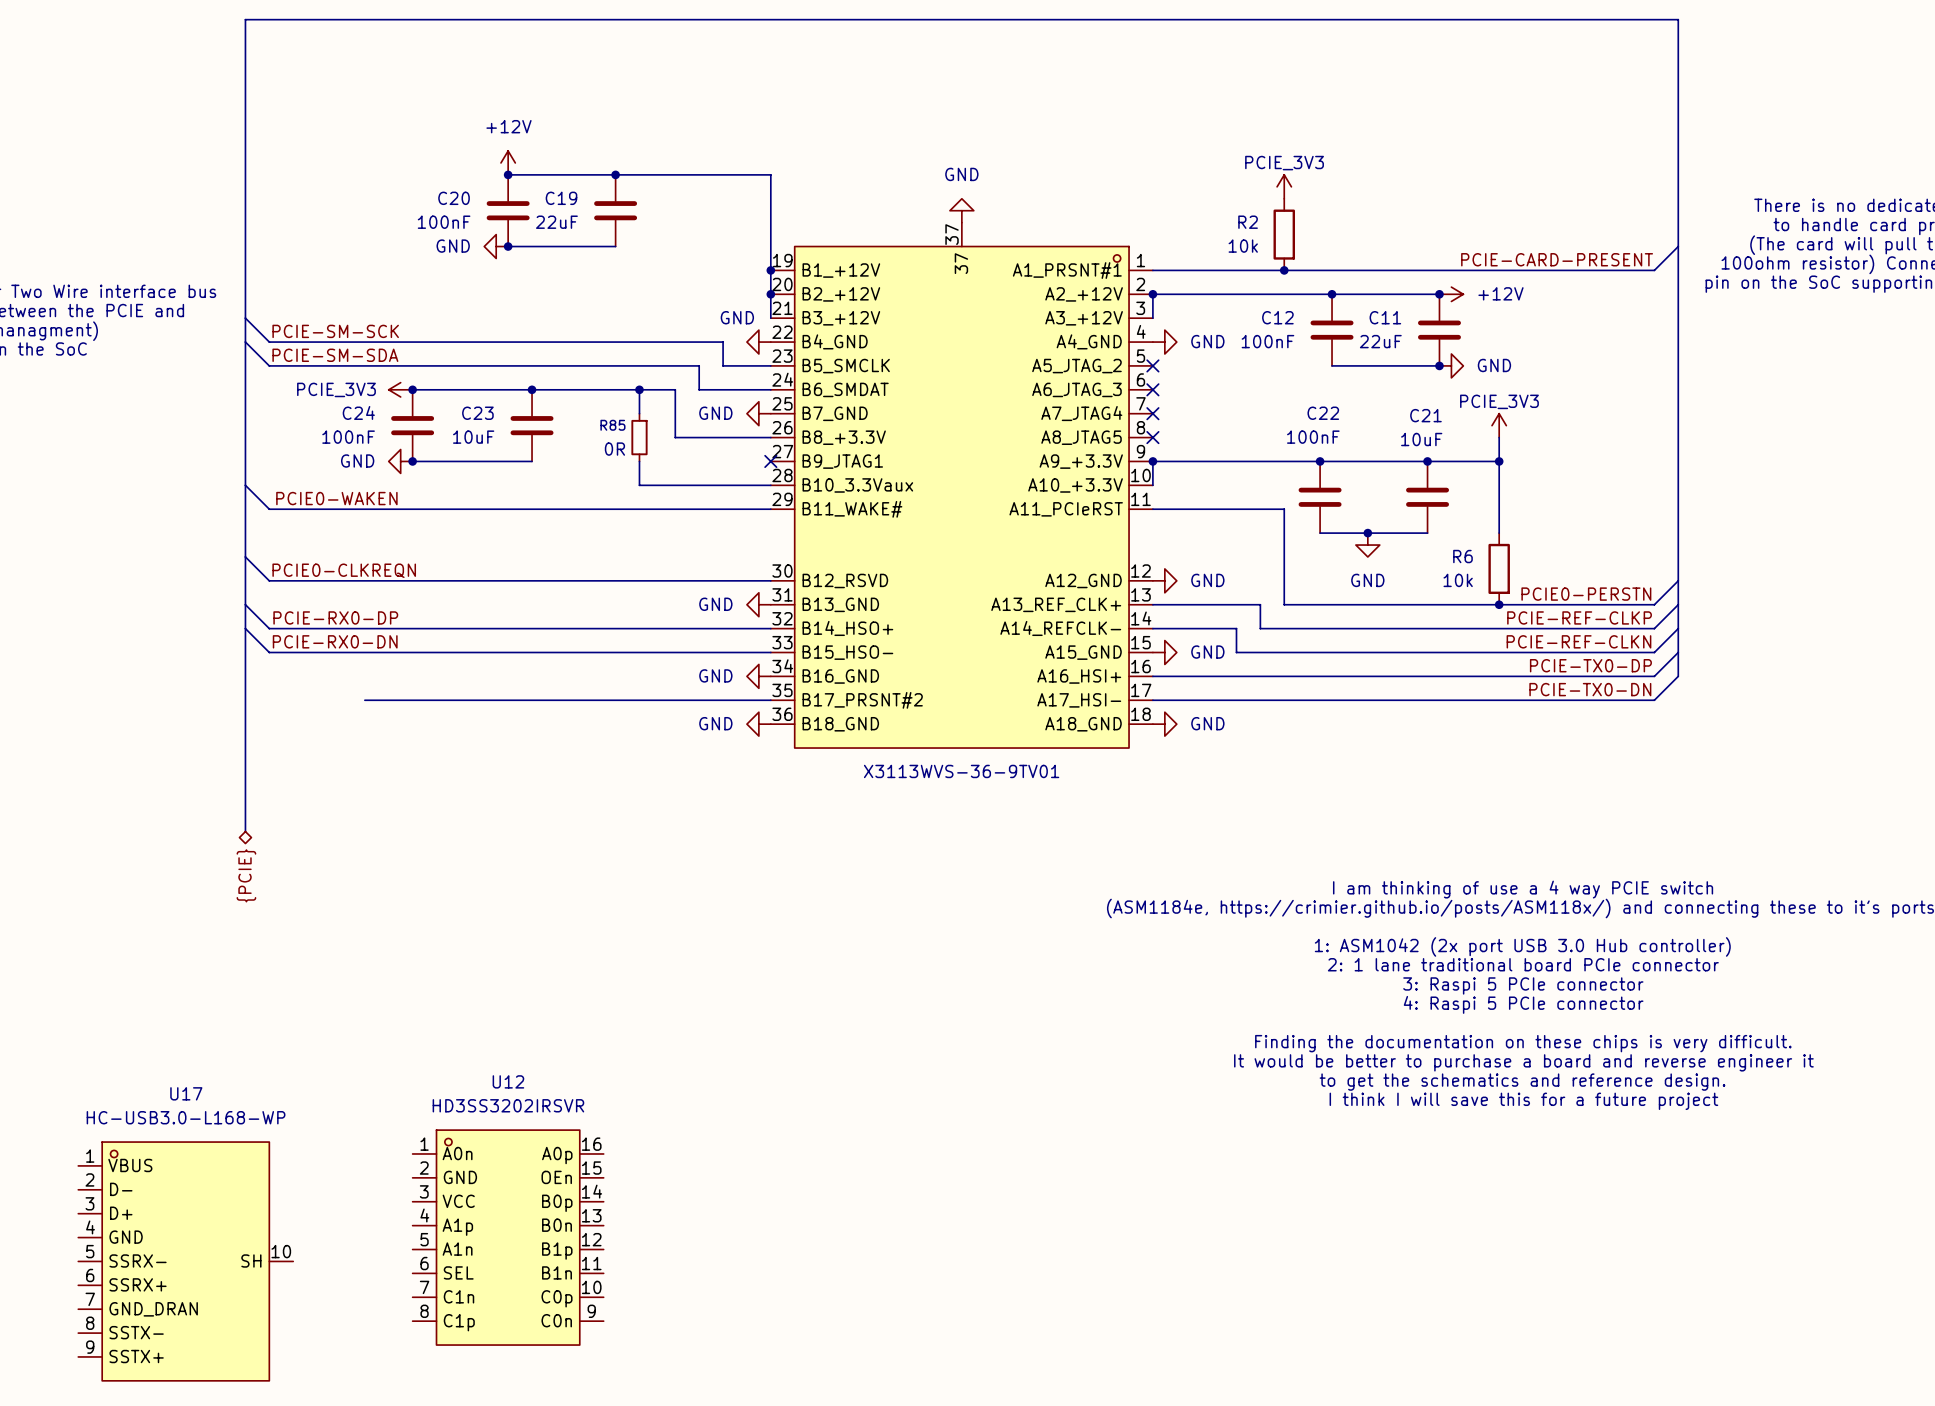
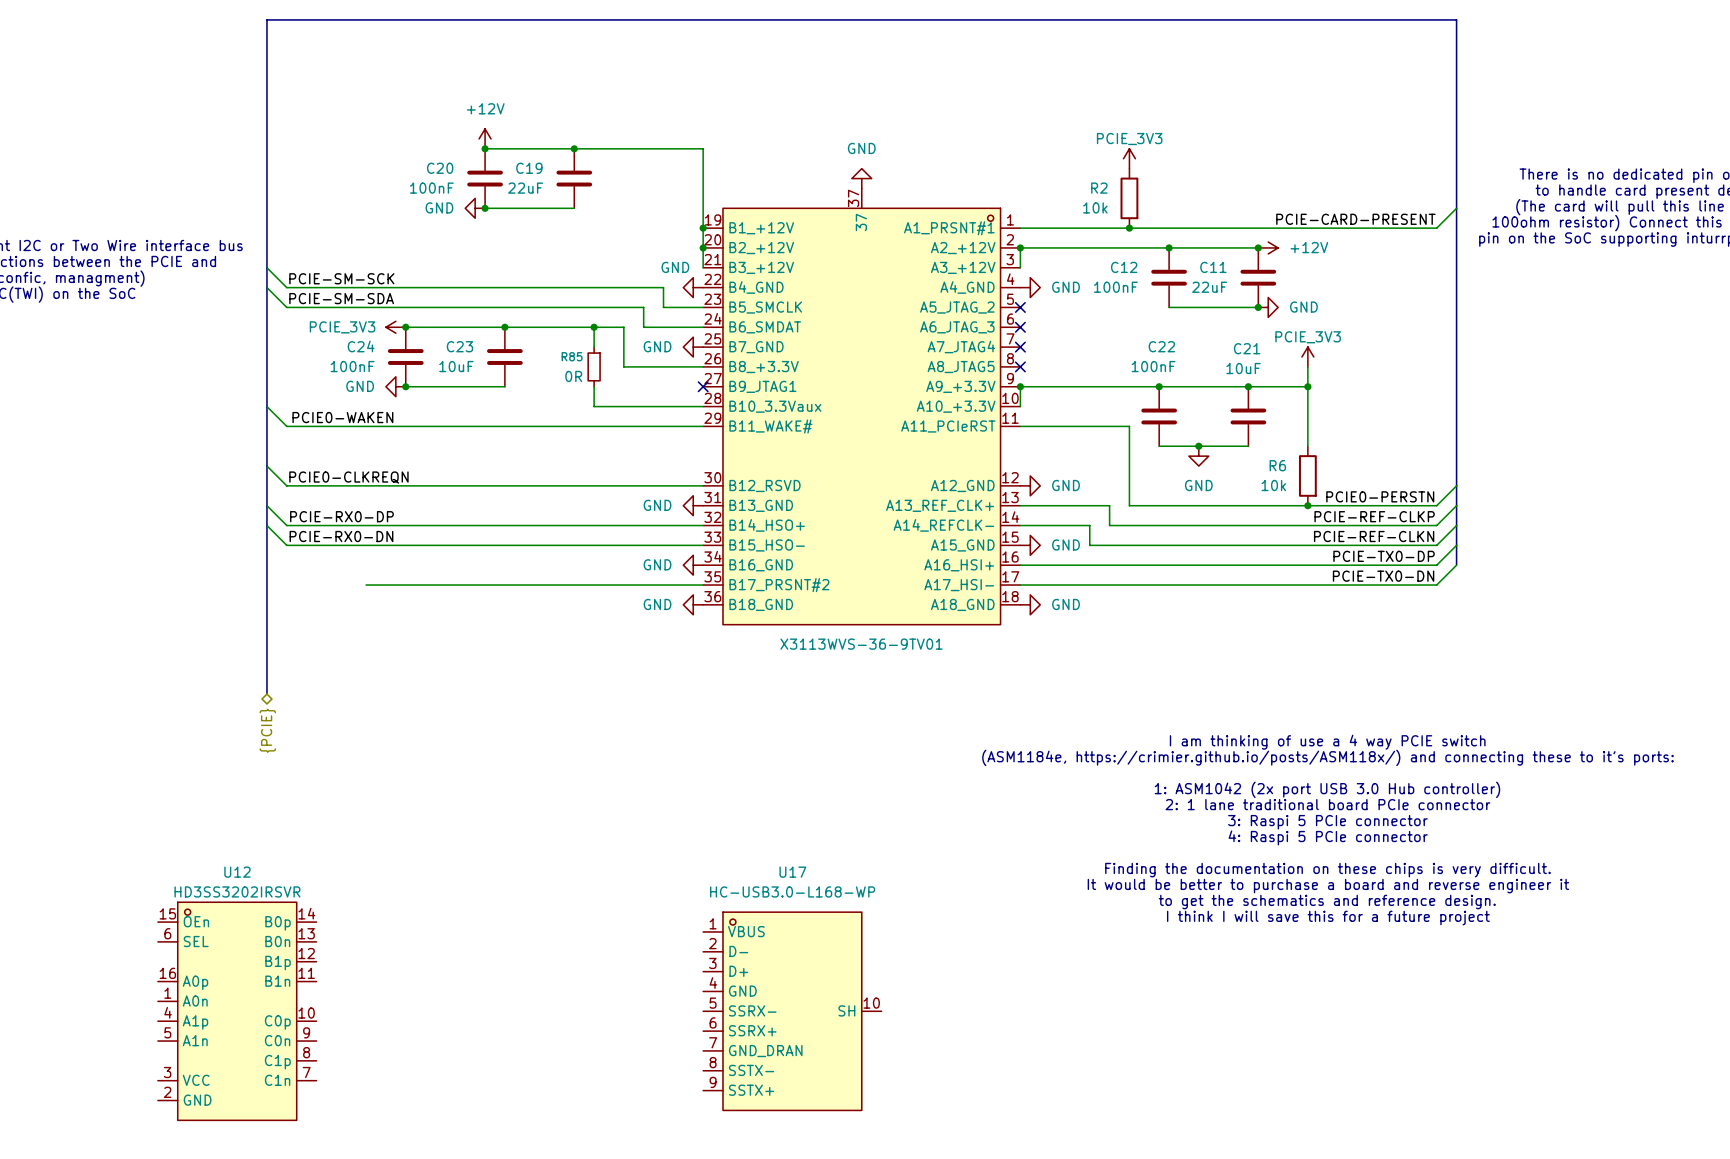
U12 symbol: [412, 1130, 604, 1346] -> [157, 902, 317, 1121]
U17 position: (185, 1261) -> (792, 1011)

